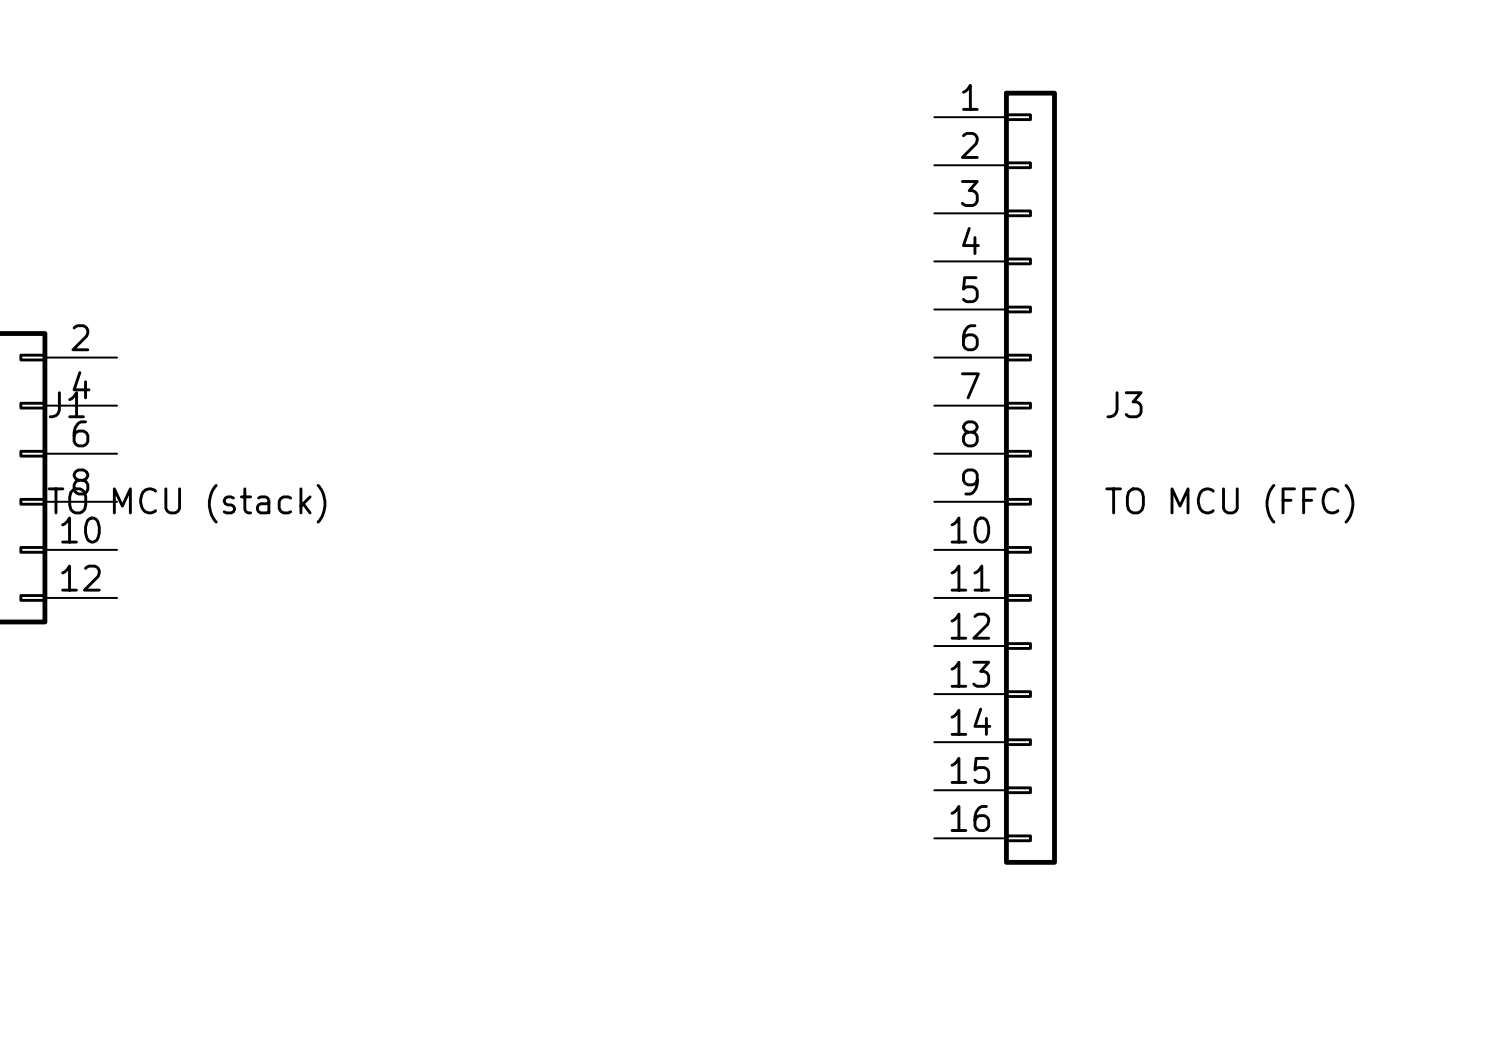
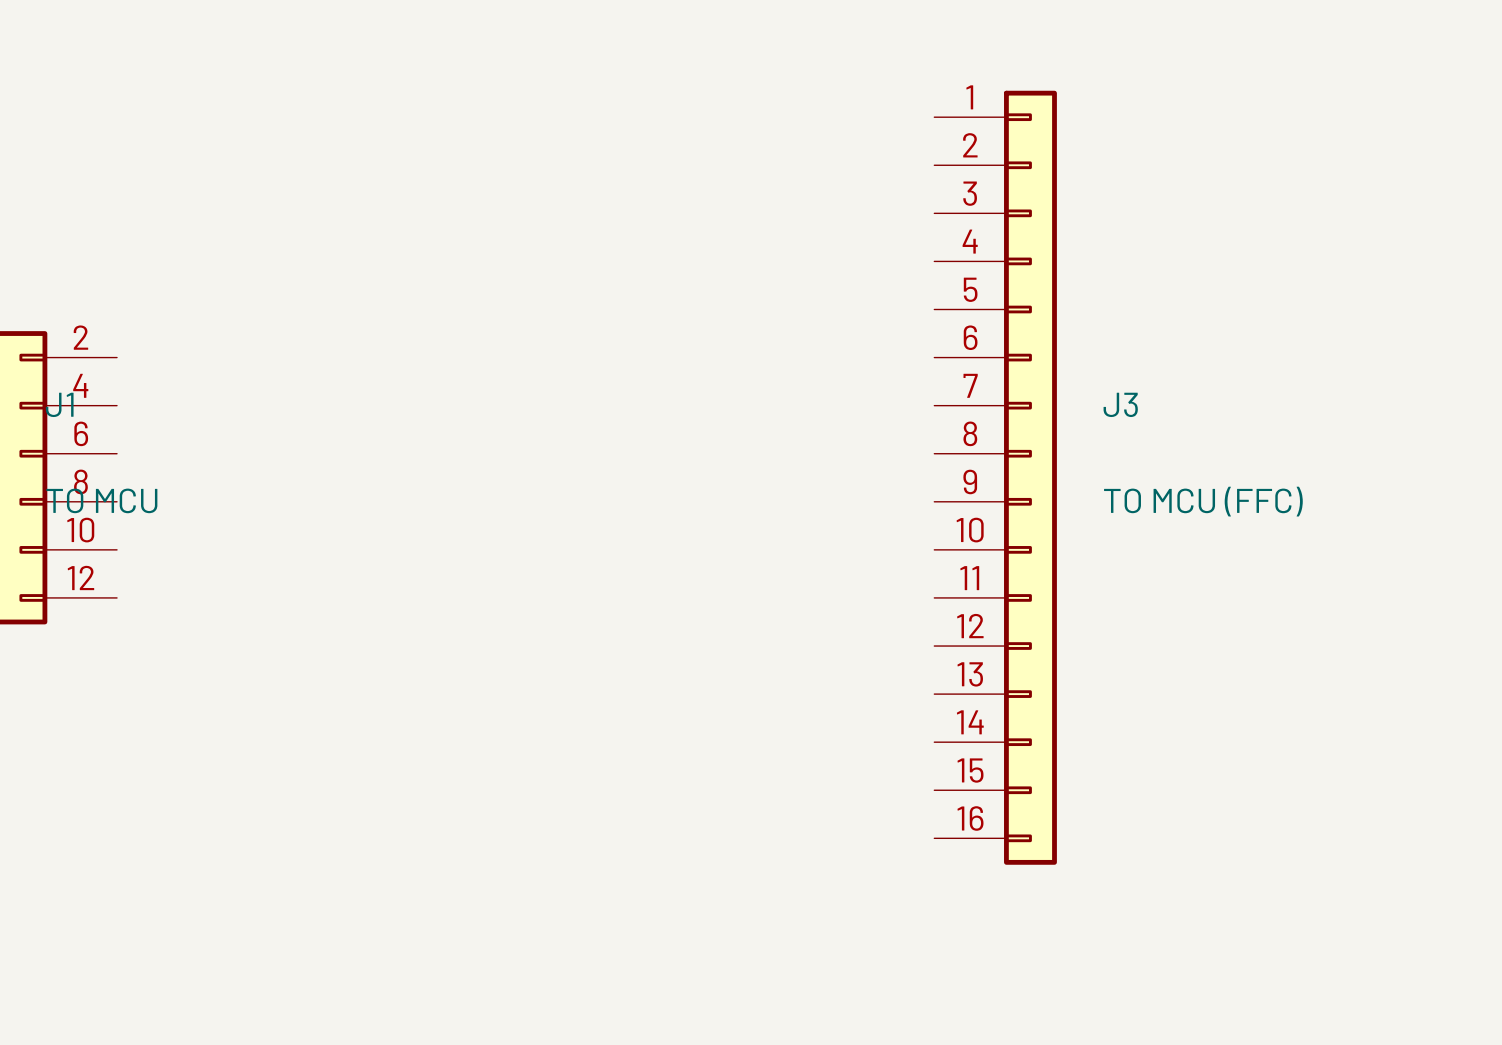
J1 value: TO MCU (stack) (187, 503) -> TO MCU (101, 500)

